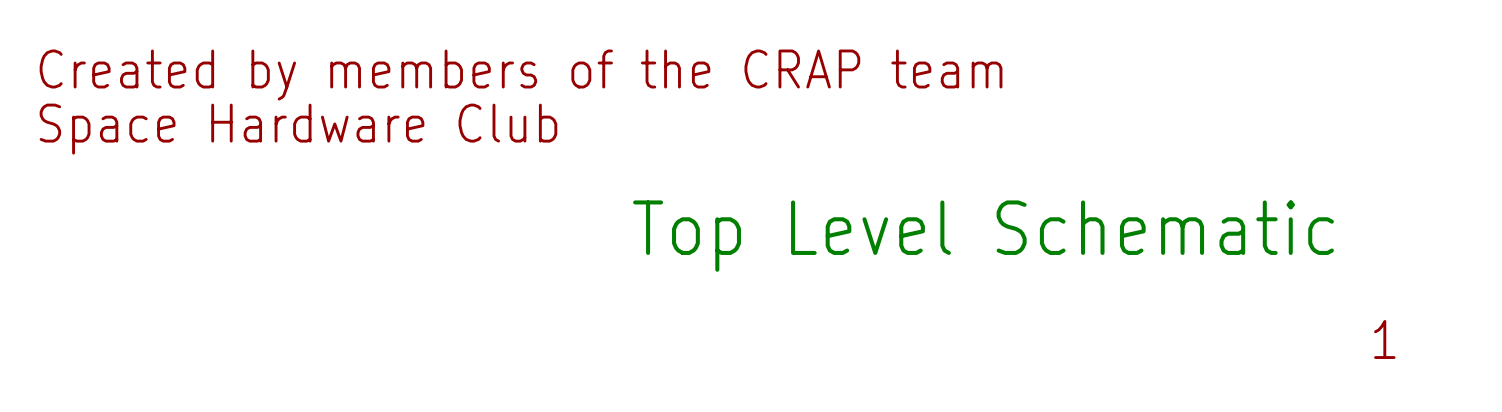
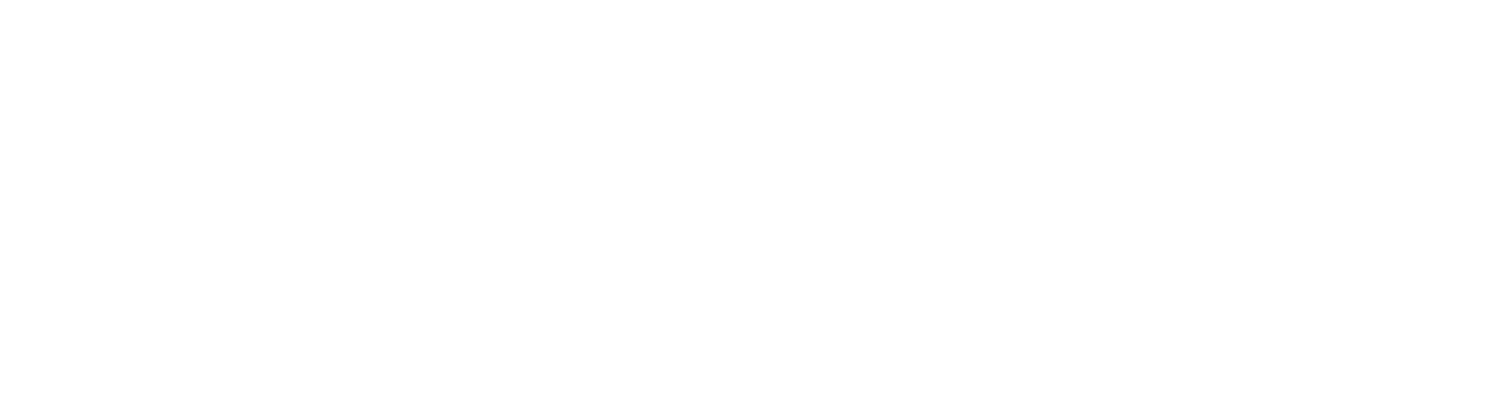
text: Created by members of the CRAP team (521, 75) -> none
text: Space Hardware Club (298, 129) -> none
text: Top Level Schematic (983, 236) -> none
text: 1 (1384, 339) -> none

